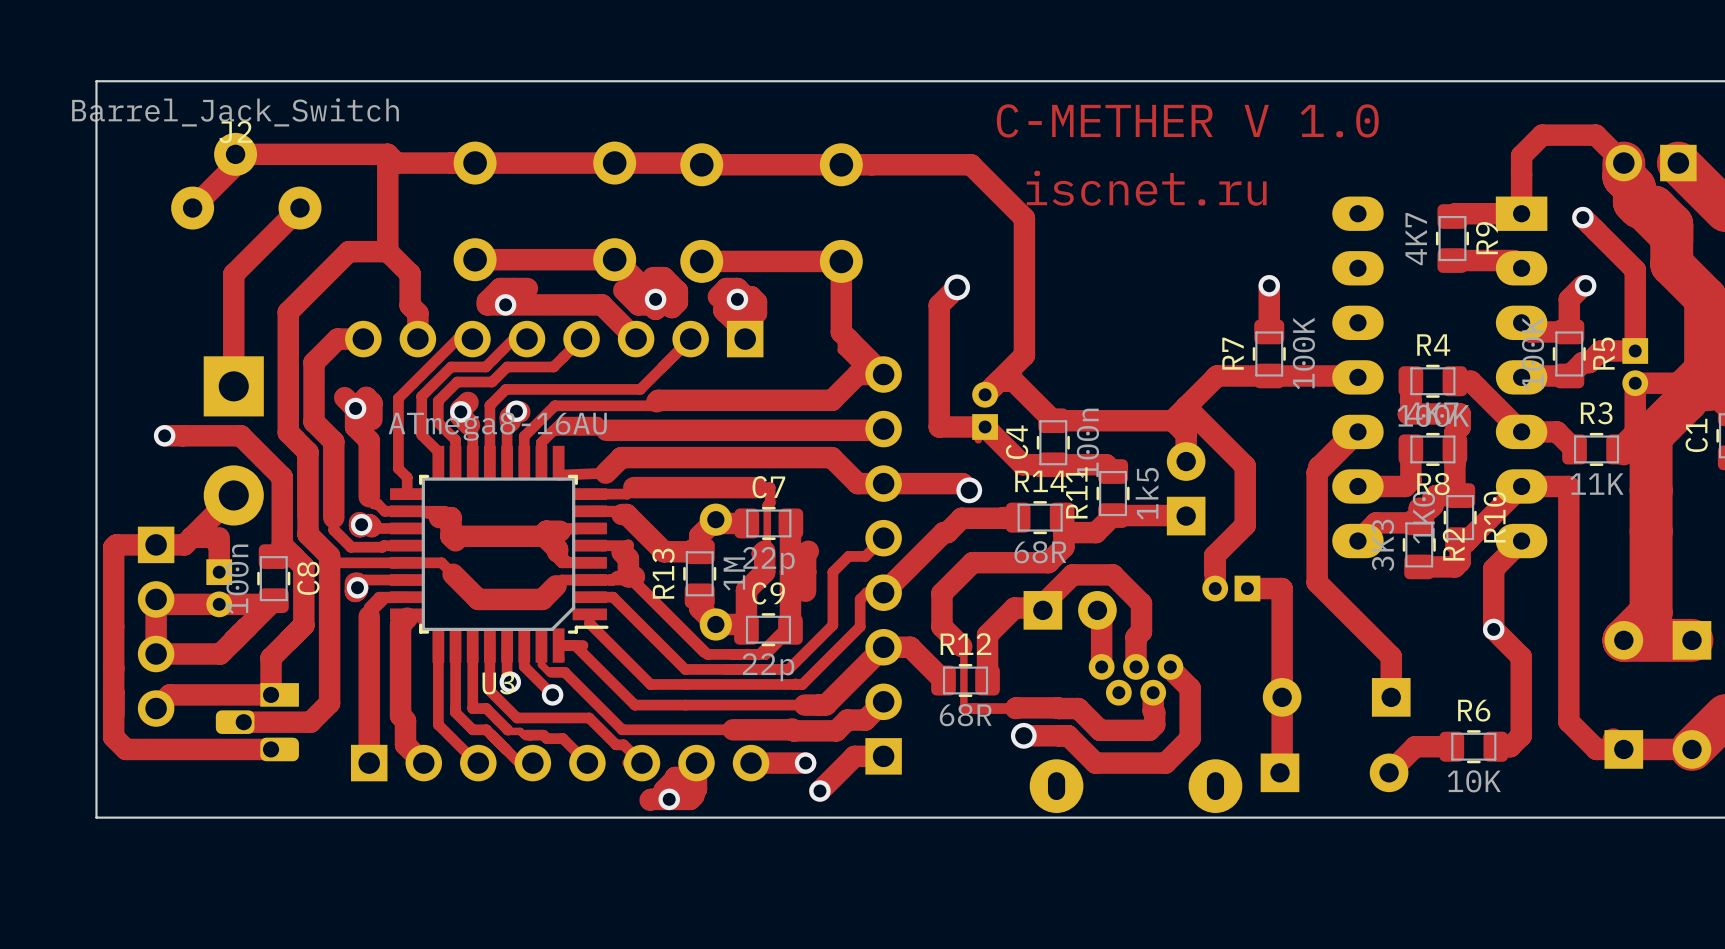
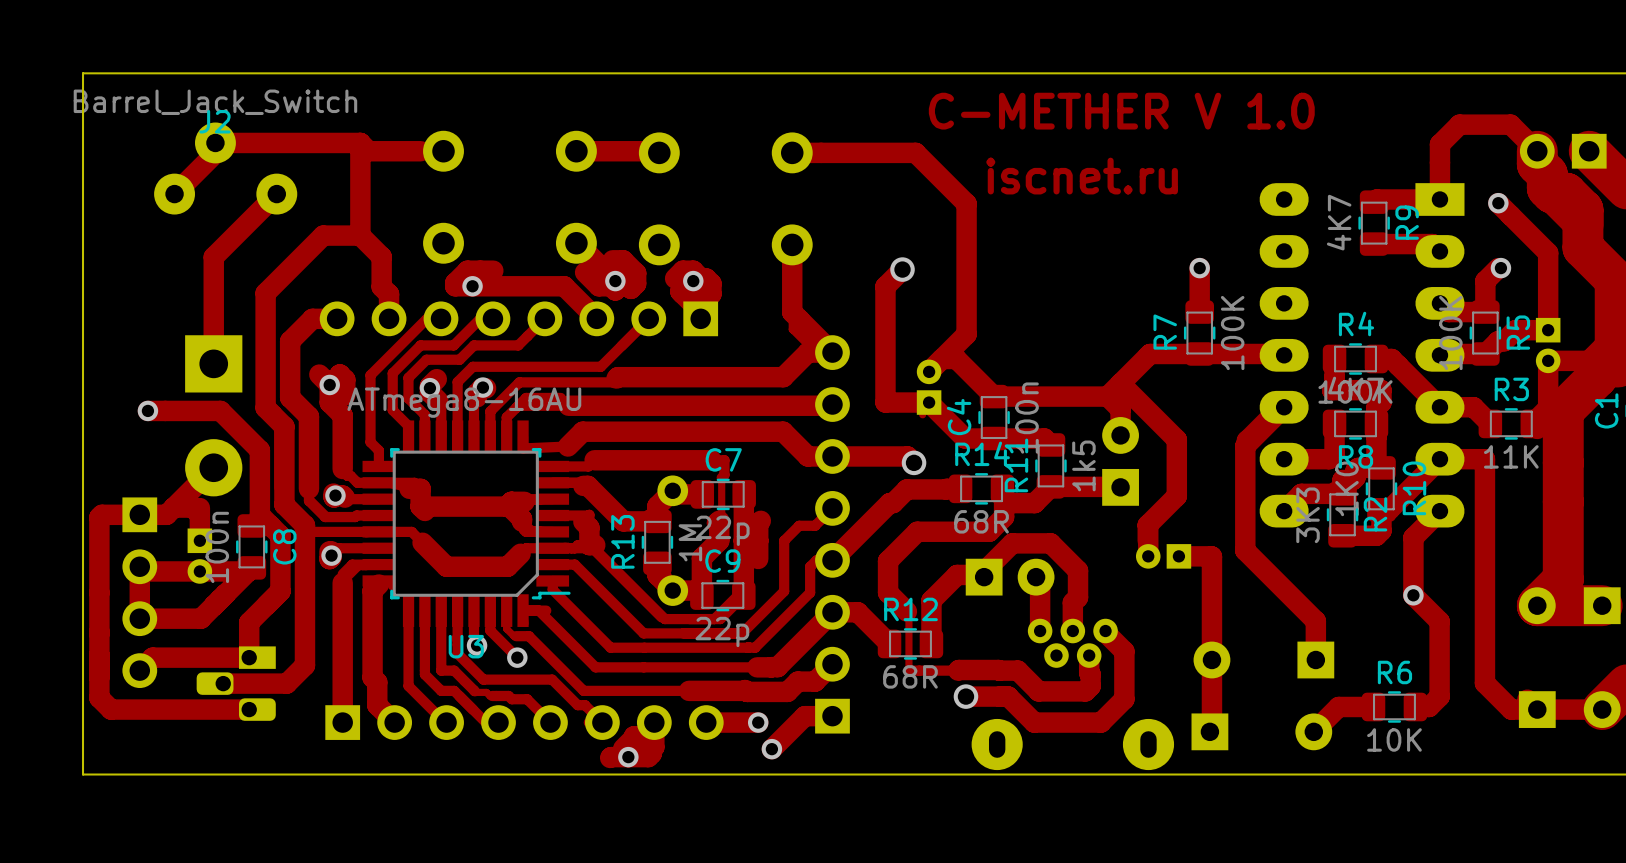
track: (451, 163) (614, 163) -> none
track: (701, 164) (841, 164) -> none
track: (475, 259) (614, 259) -> none
track: (701, 261) (841, 261) -> none

